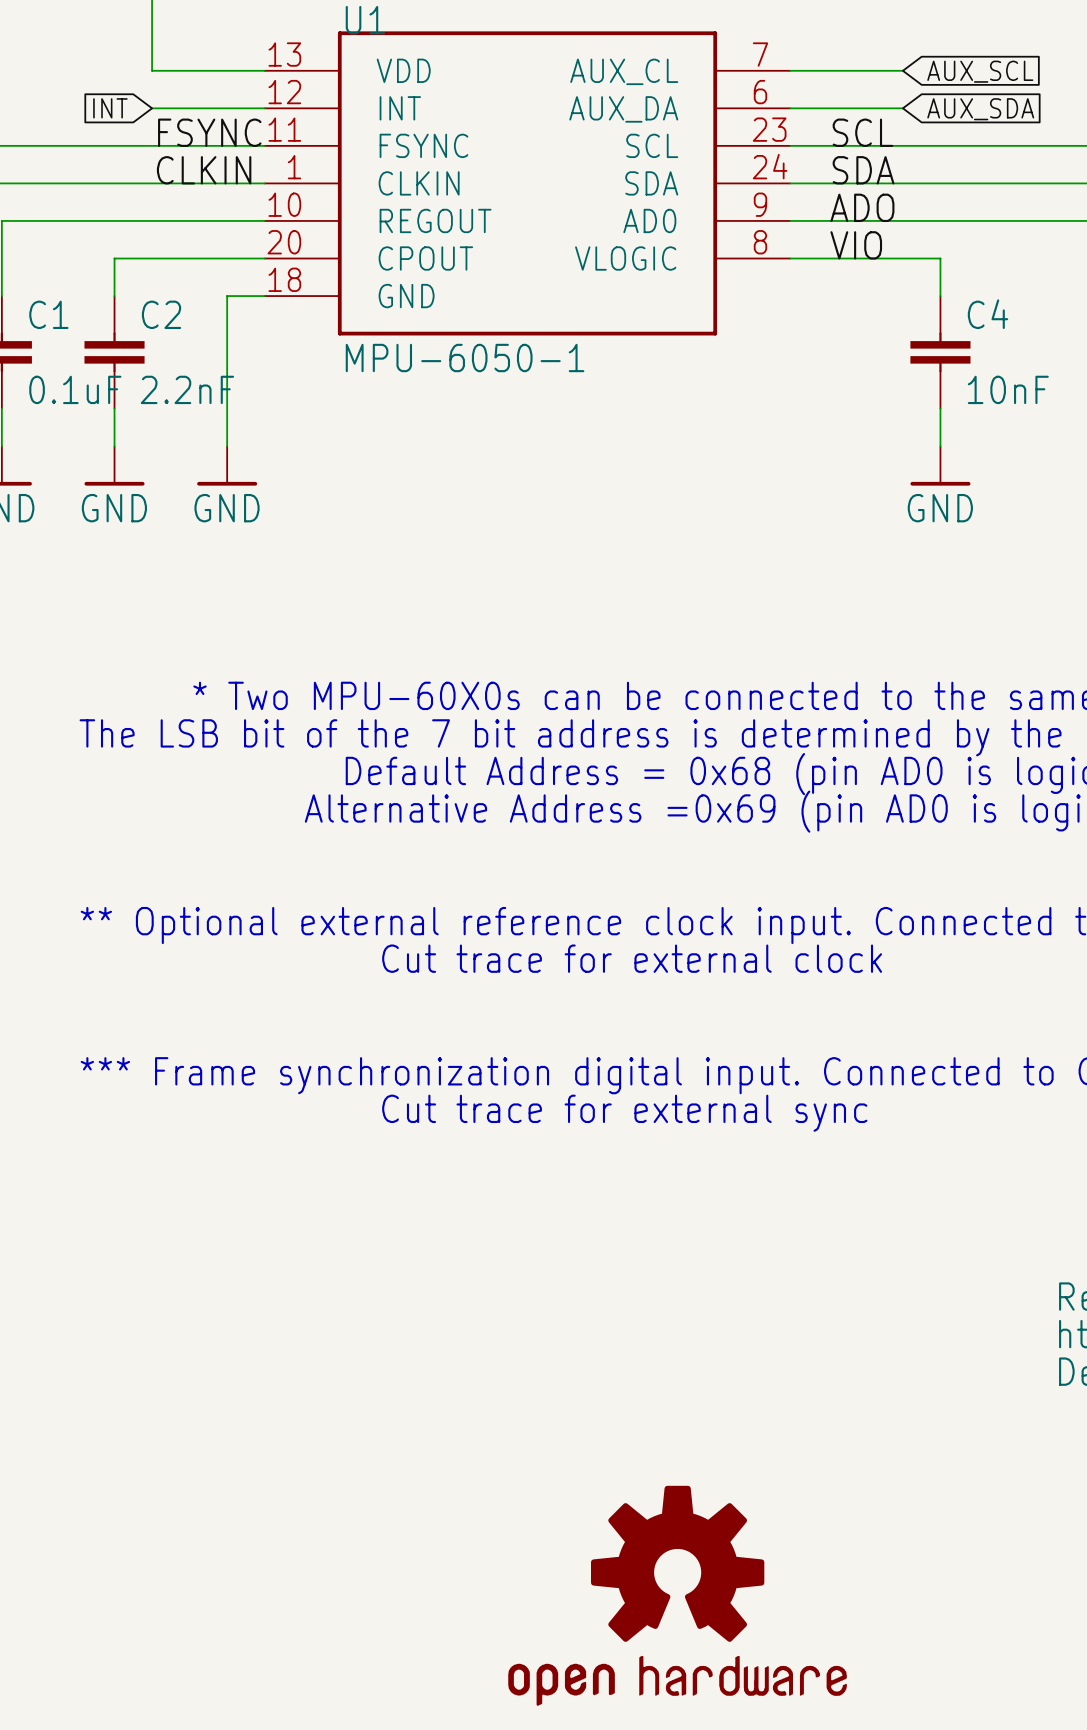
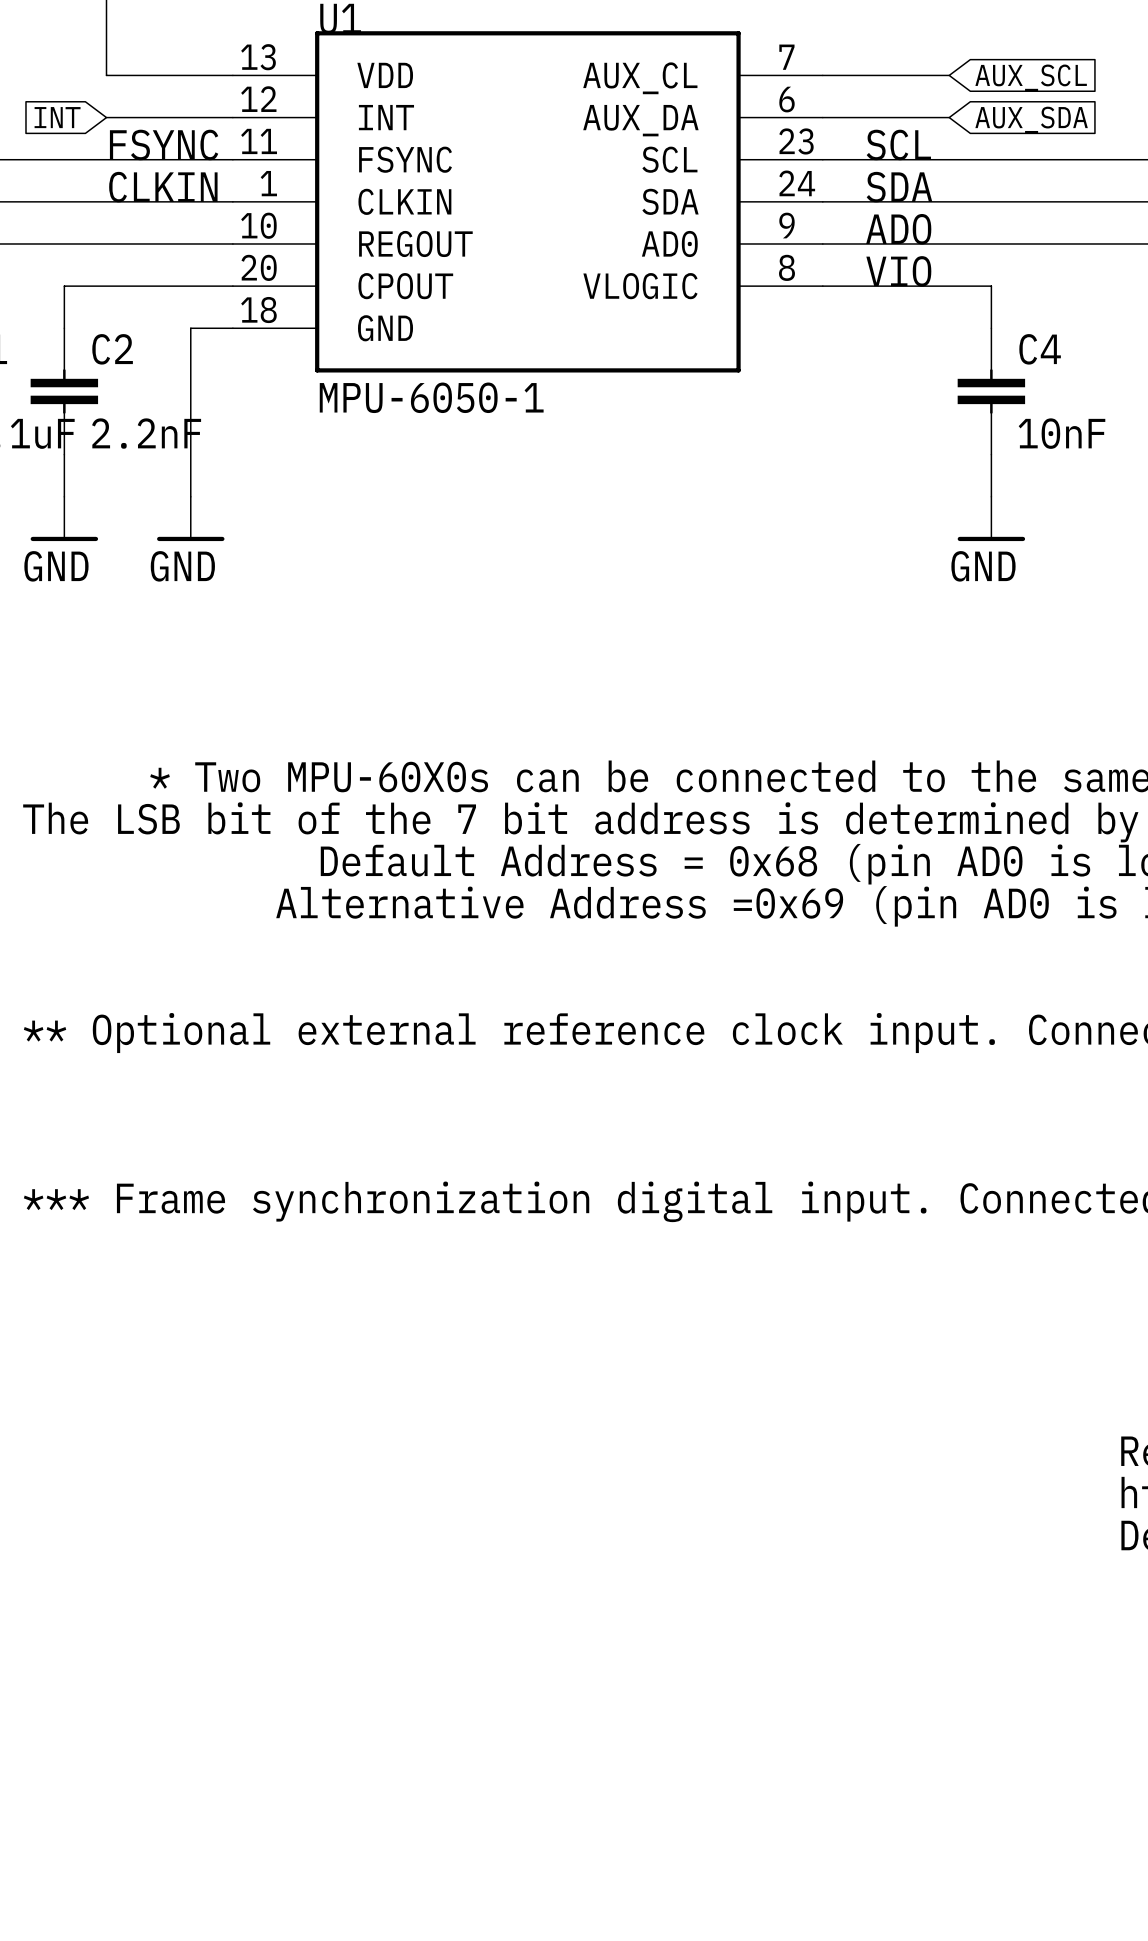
text: Cut trace for external clock (632, 958) -> none
text: Cut trace for external sync (624, 1113) -> none
part: (677, 1595) -> none

